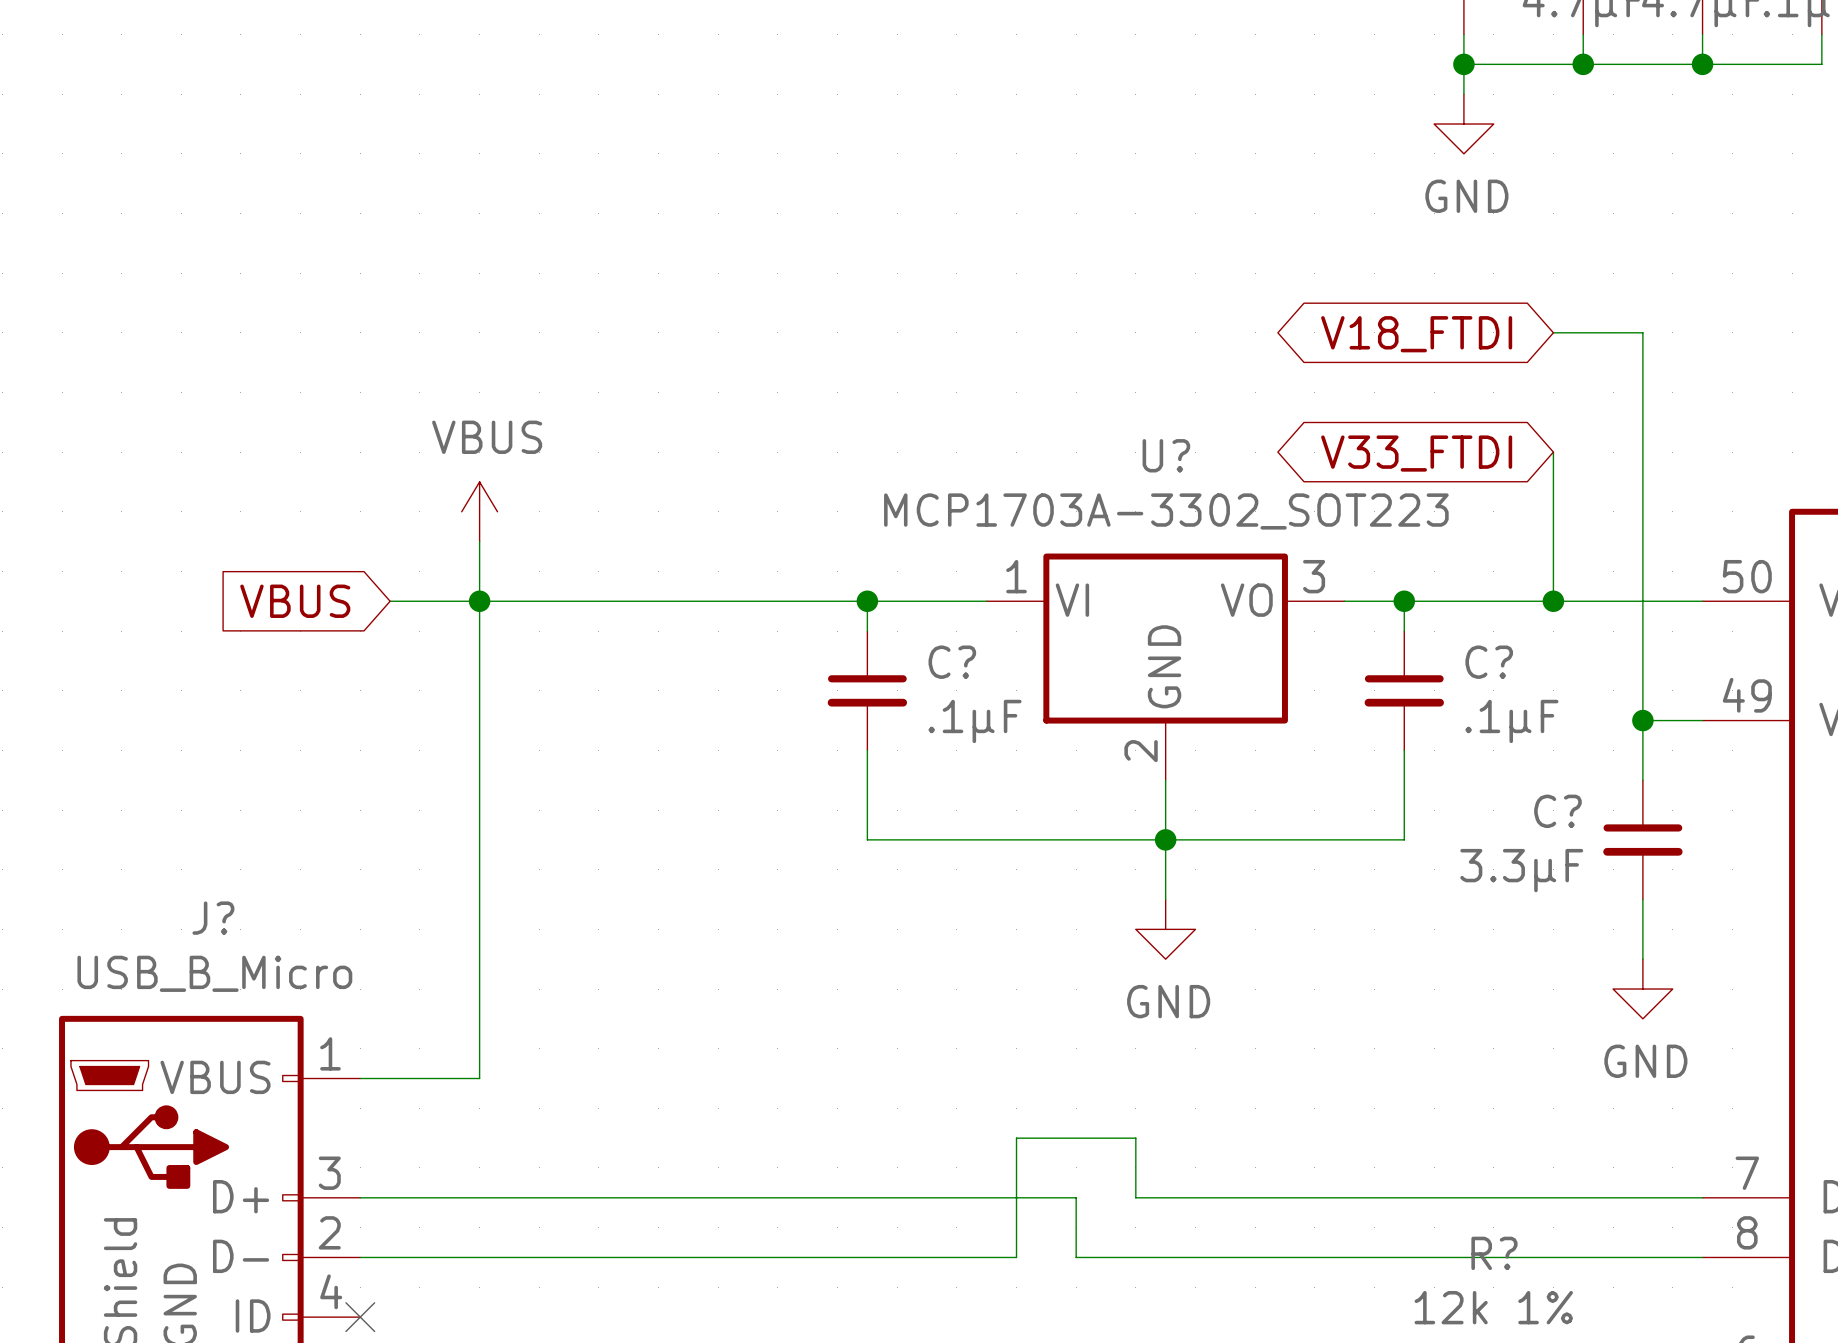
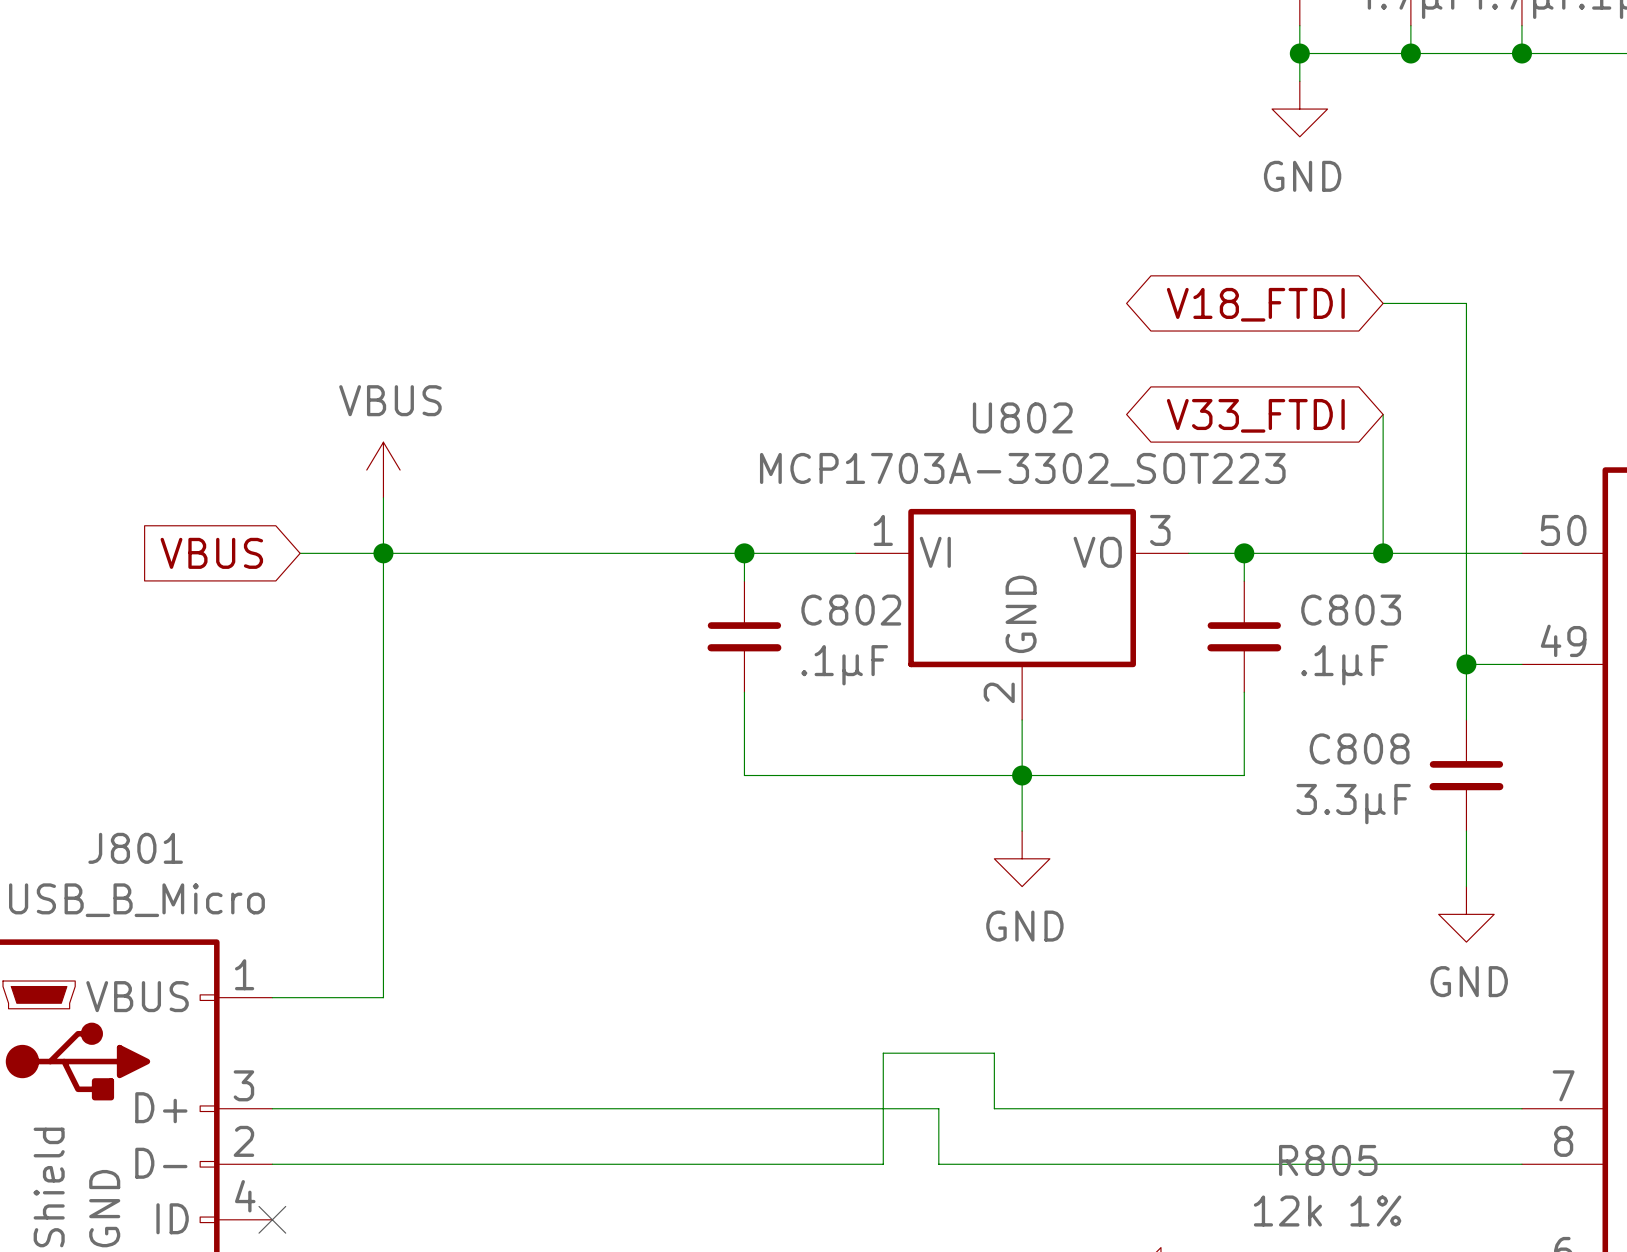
U? name: U? (1166, 455) -> U802 (1022, 417)
C? name: C? (952, 662) -> C802 (851, 610)
C? name: C? (1489, 662) -> C803 (1351, 610)
C? name: C? (1557, 811) -> C808 (1359, 748)
J? name: J? (213, 918) -> J801 (135, 848)
R? name: R? (1494, 1253) -> R805 (1328, 1160)

